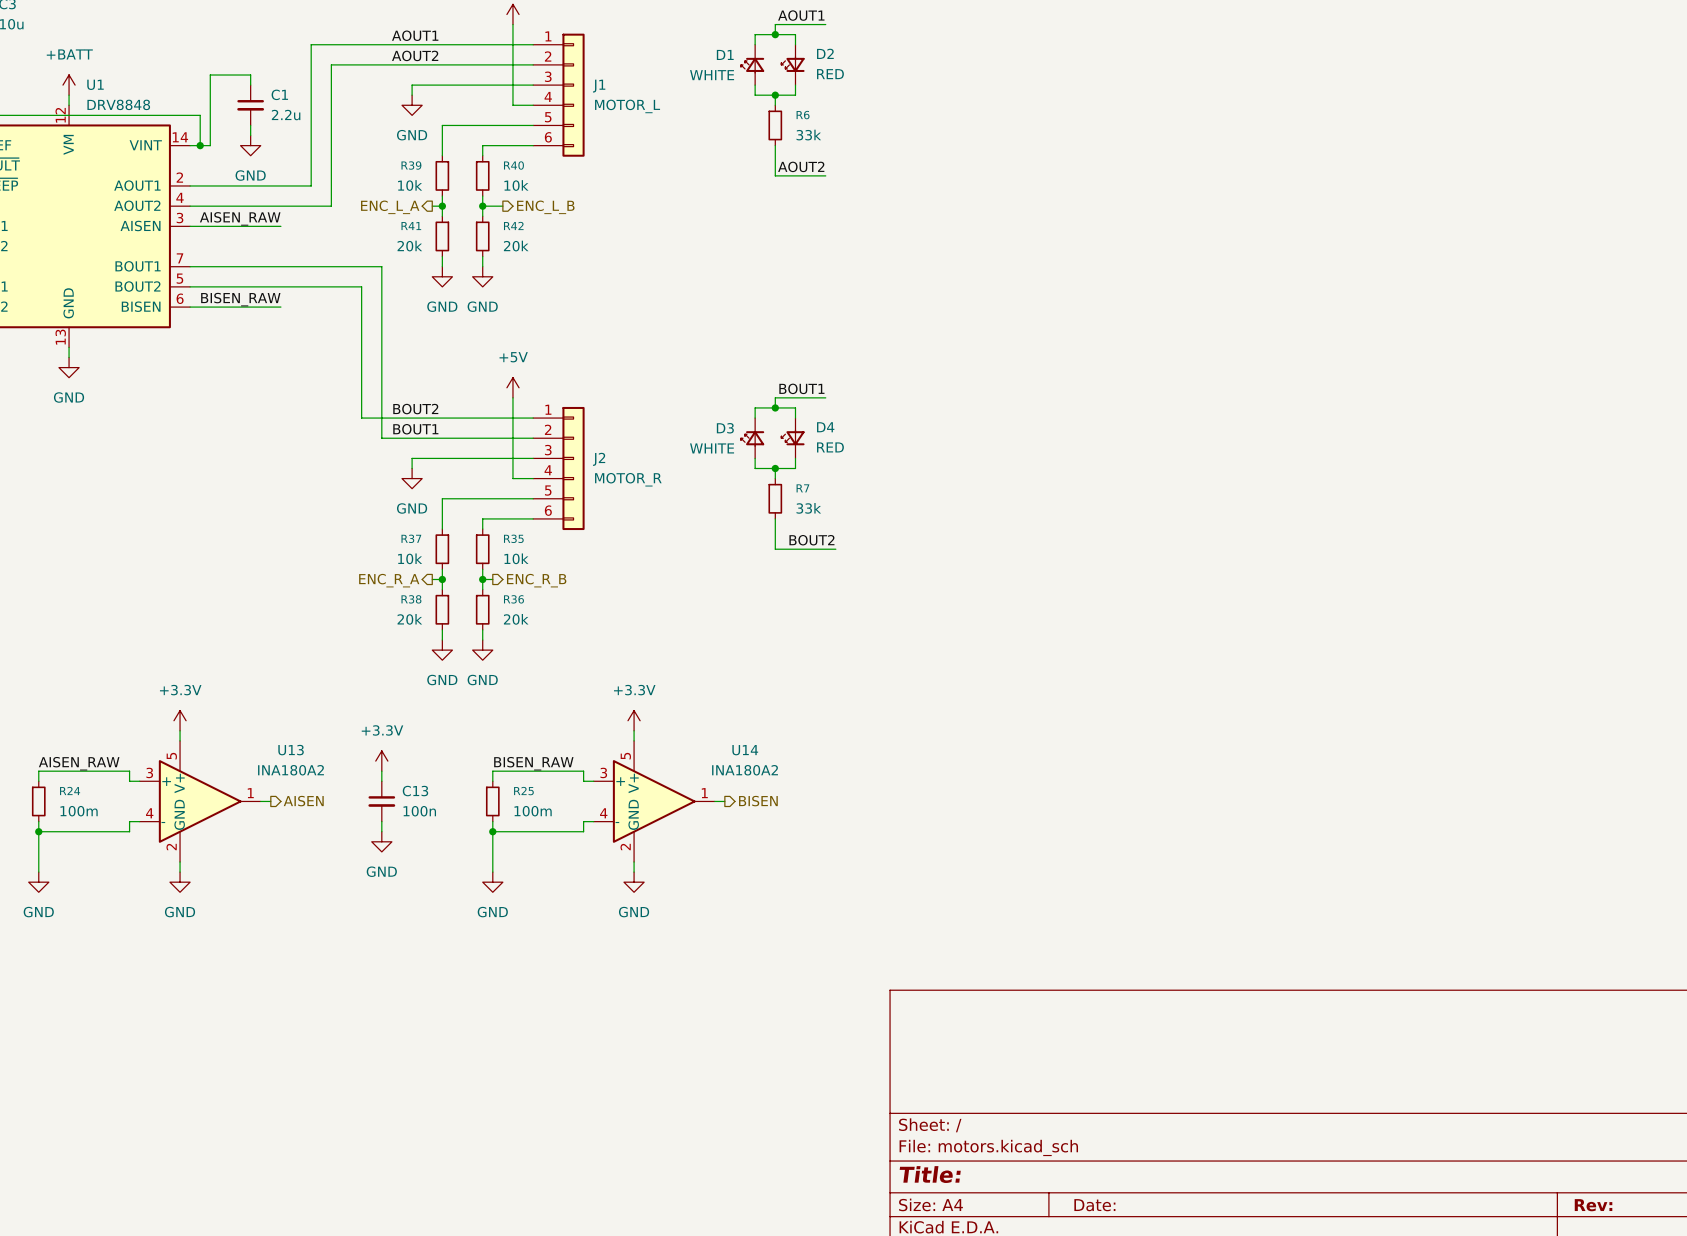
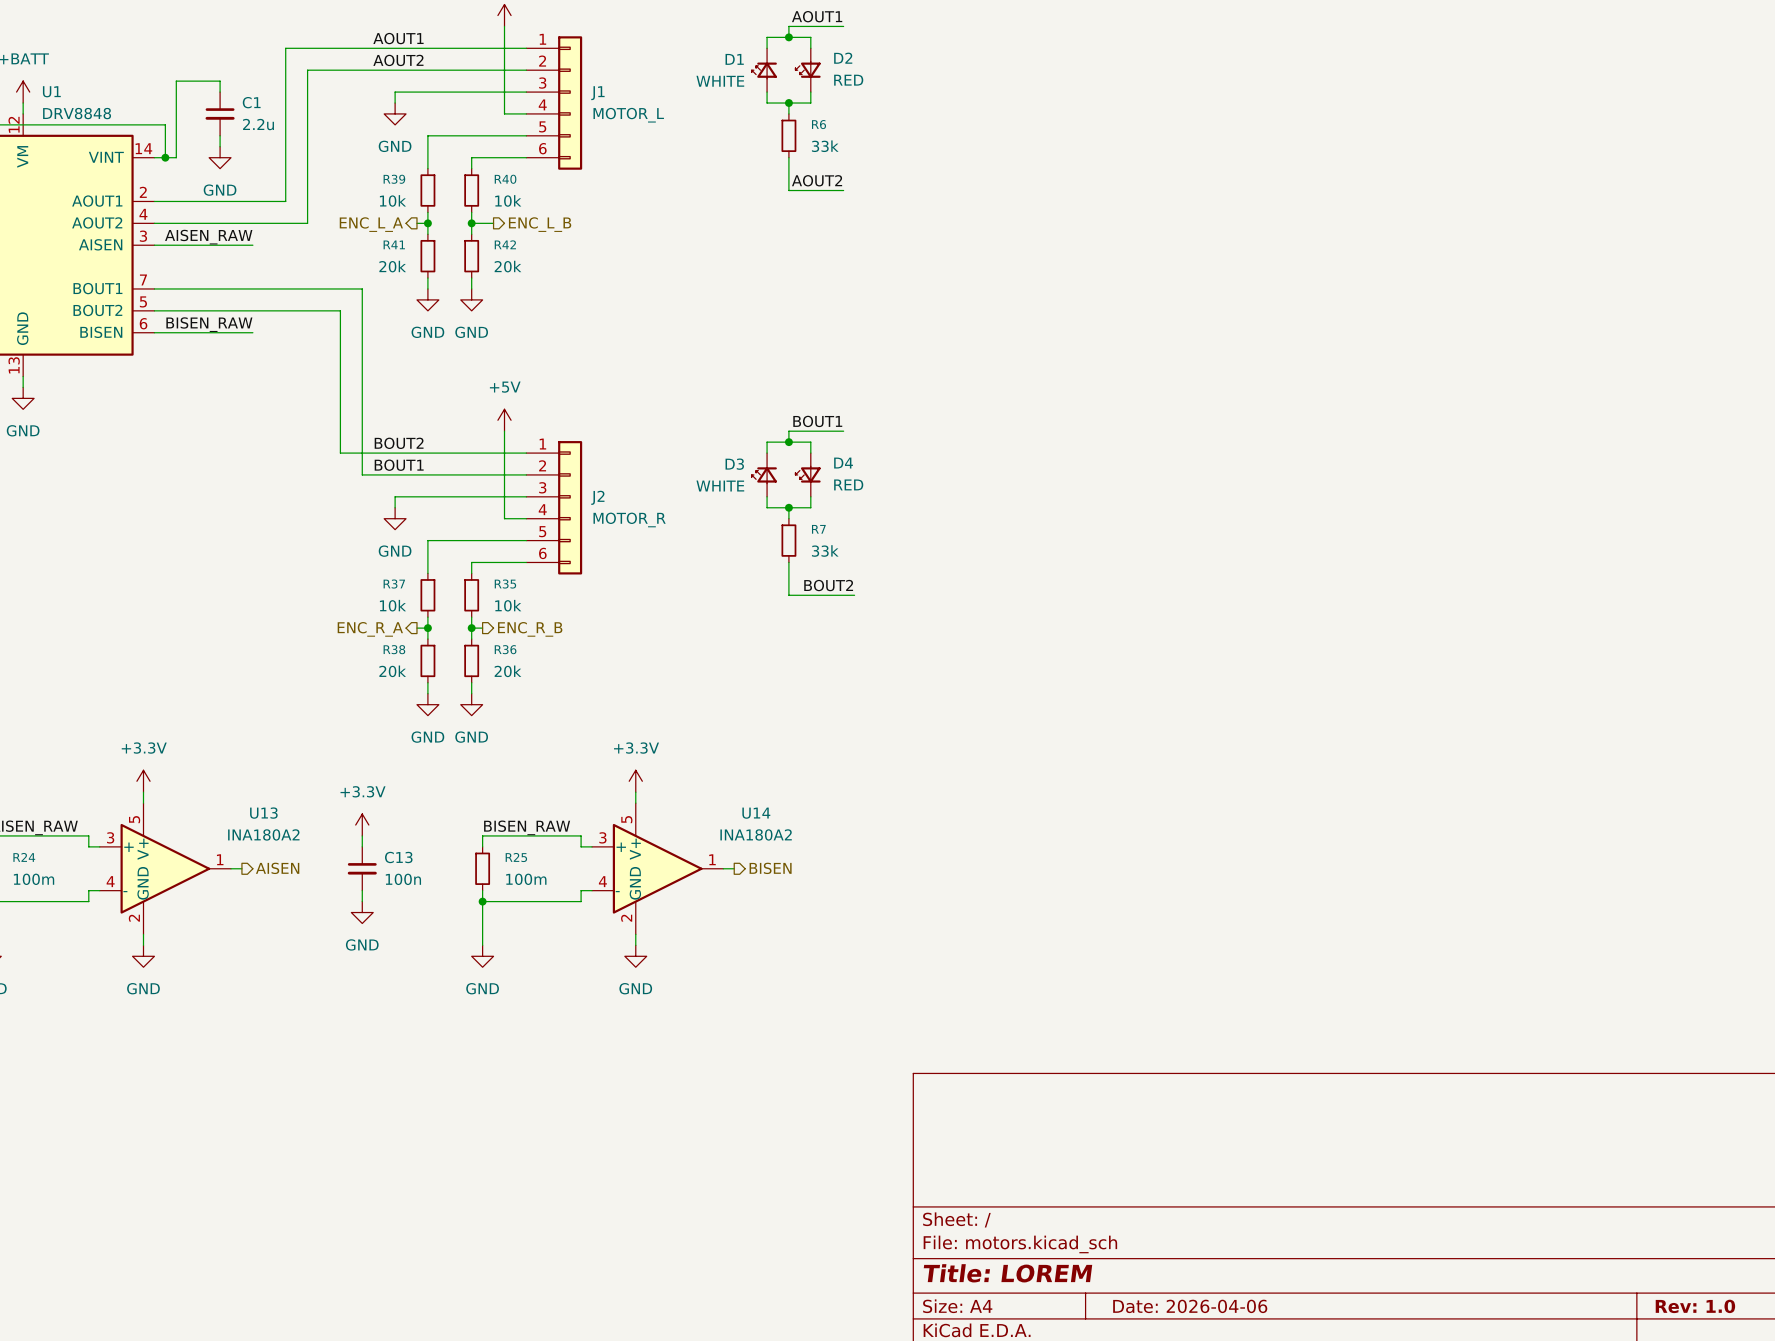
title block: Title: (930, 1174) -> Title: LOREM (1007, 1273)
title block: Date: (1094, 1205) -> Date: 2026-04-06 (1190, 1306)
title block: Rev: (1593, 1205) -> Rev: 1.0 (1695, 1306)

